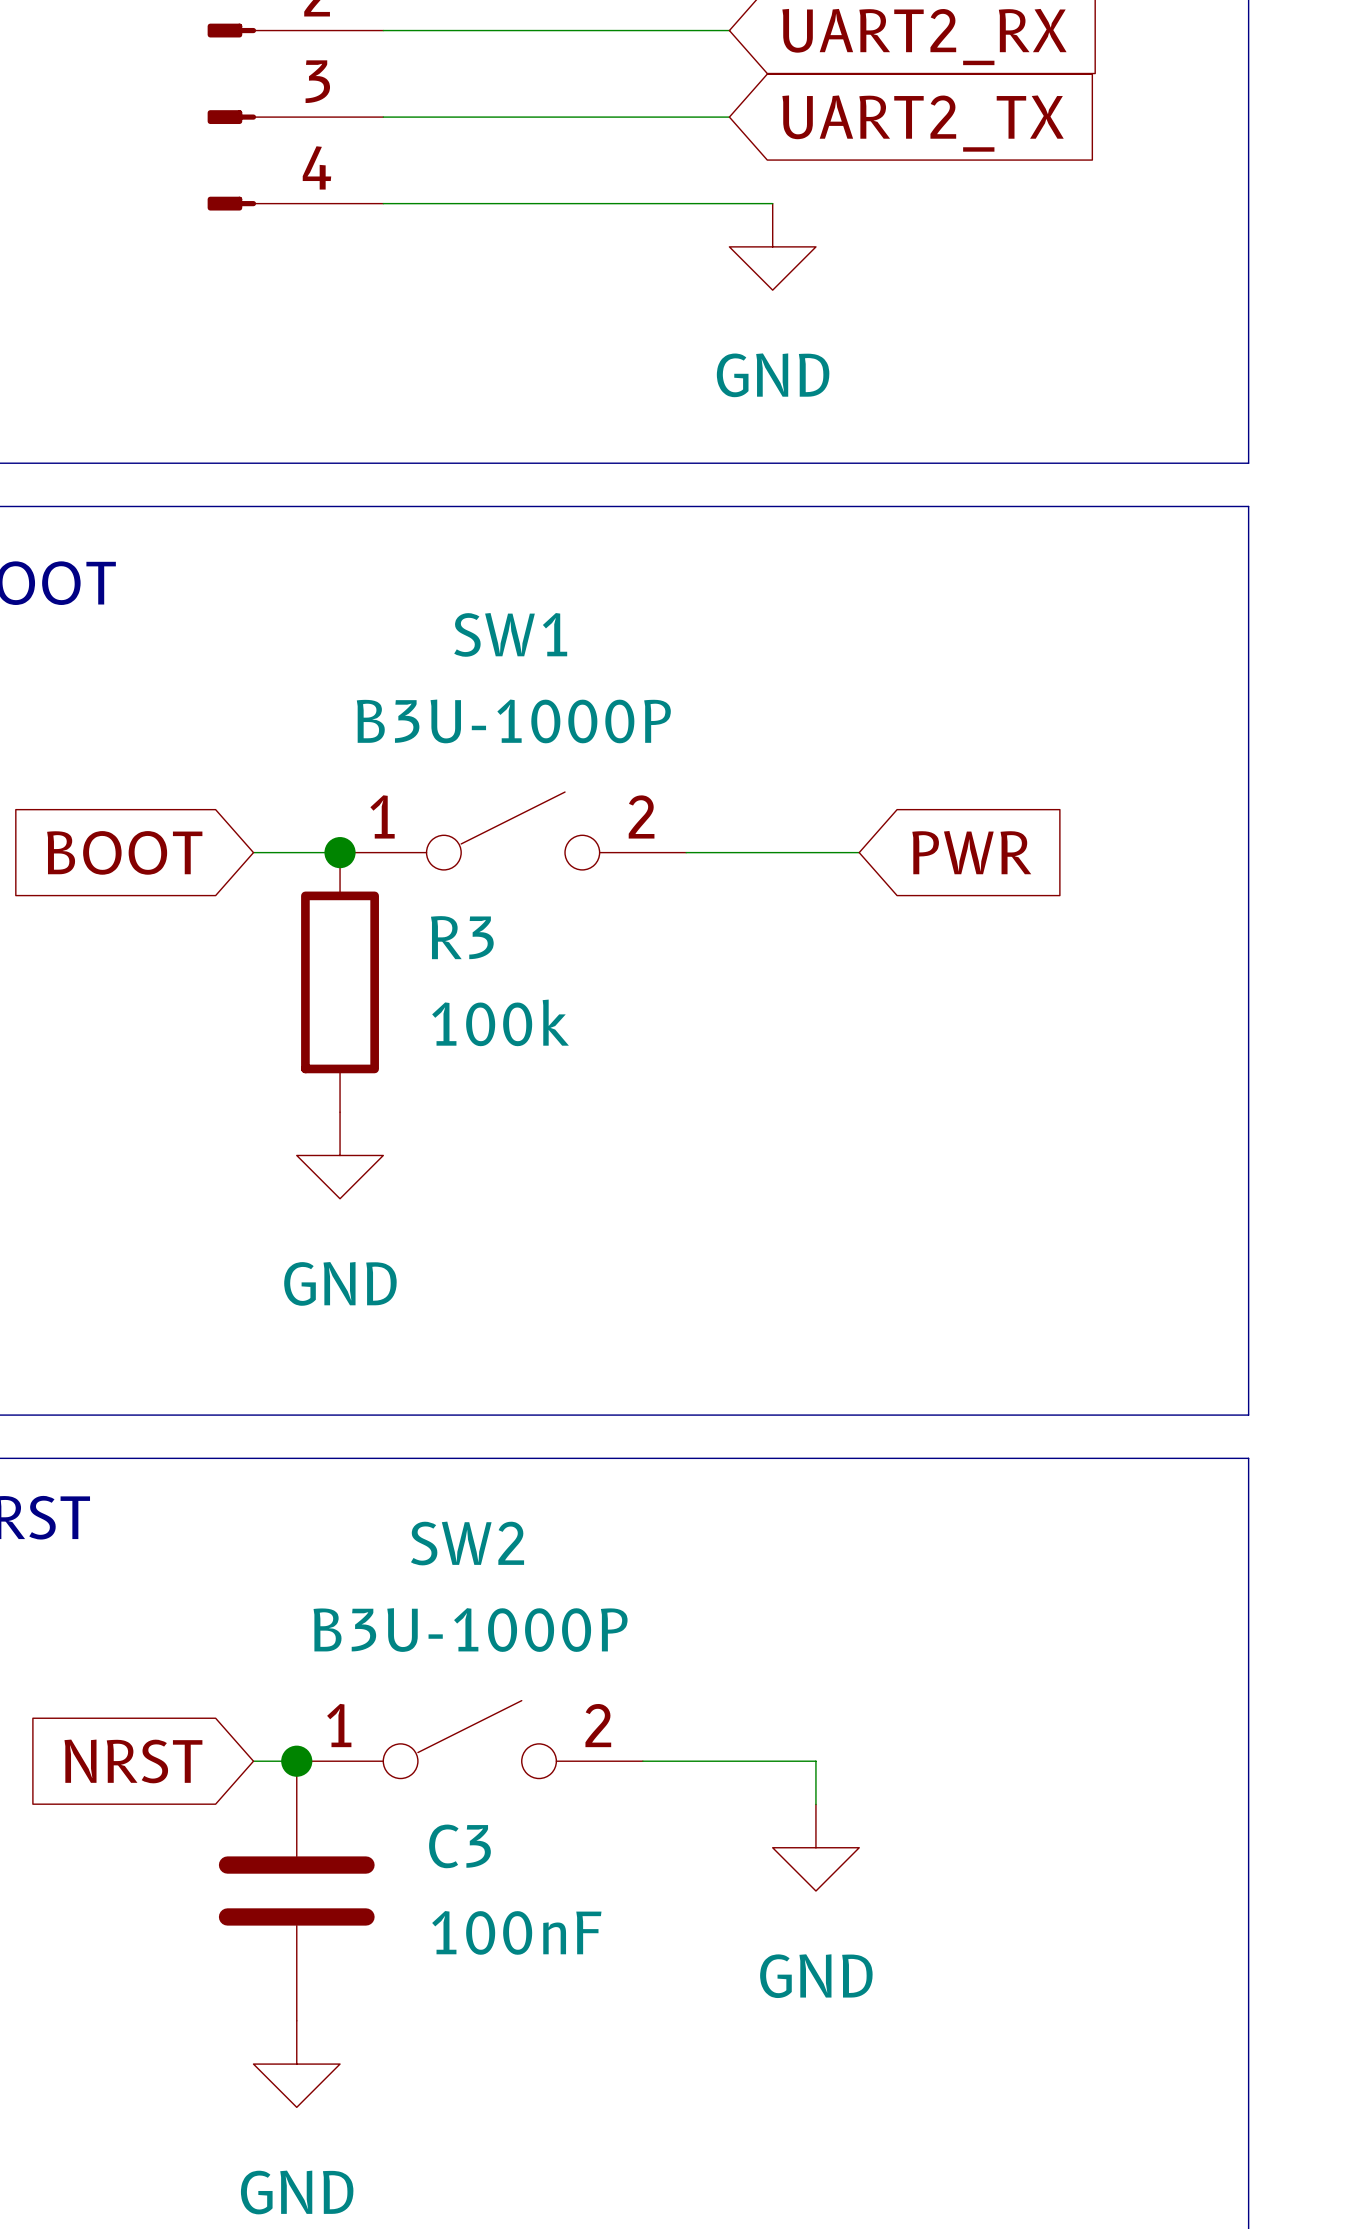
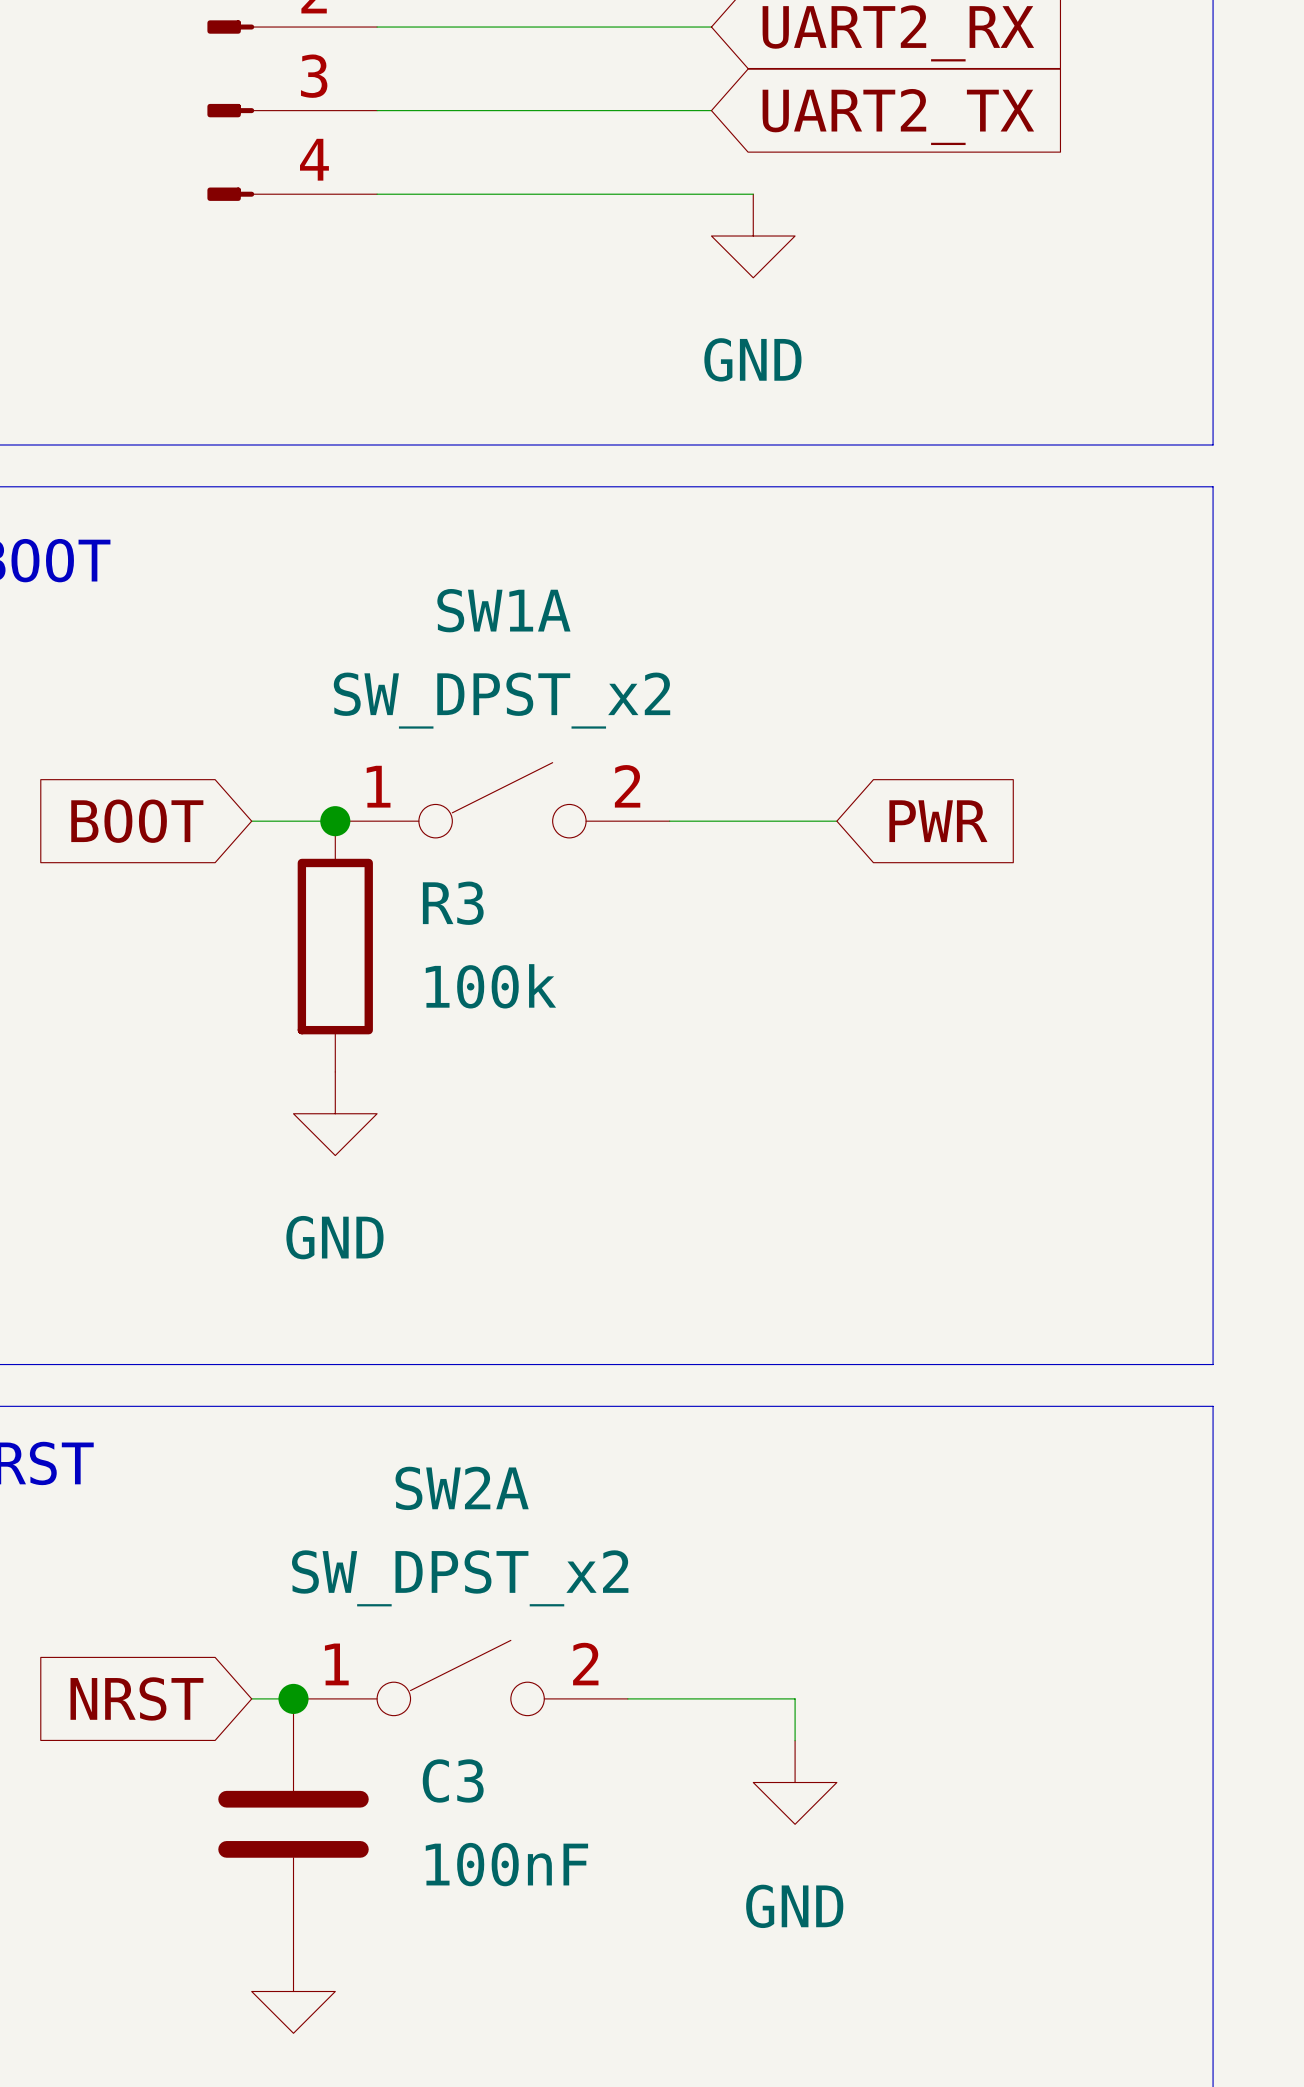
SW1 name: SW1 (510, 634) -> SW1A (503, 610)
SW1 value: B3U-1000P (513, 721) -> SW_DPST_x2 (502, 700)
SW2 name: SW2 (467, 1543) -> SW2A (462, 1488)
SW2 value: B3U-1000P (470, 1630) -> SW_DPST_x2 (460, 1578)

